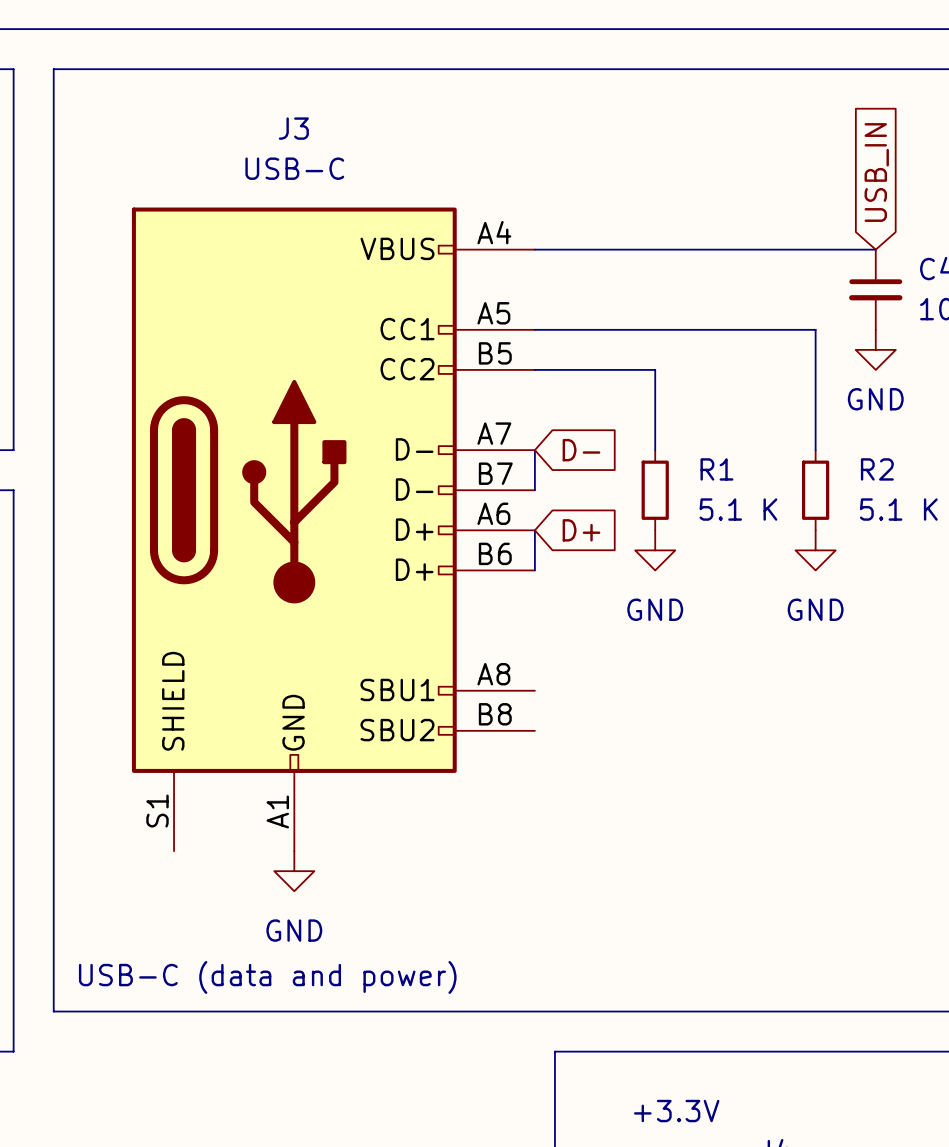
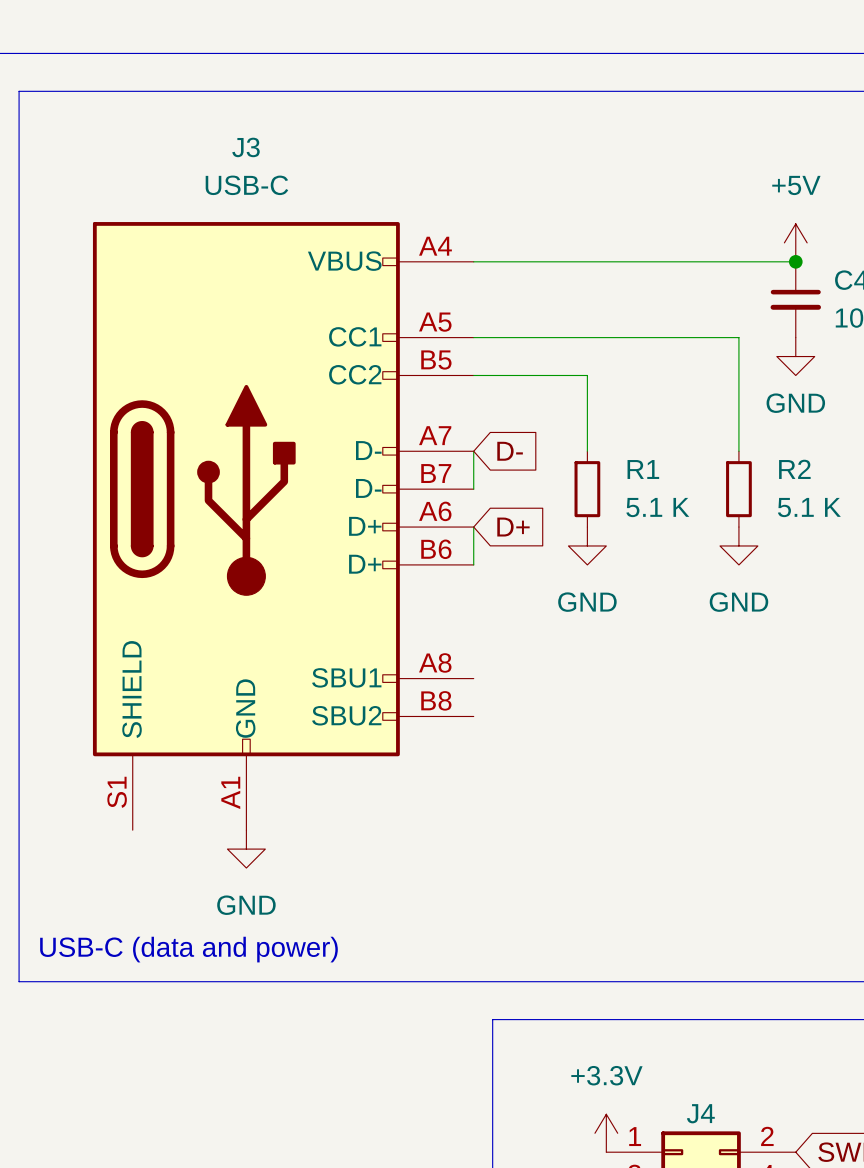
global label: USB_IN (876, 172) -> none
power symbol: none -> +5V (795, 242)
junction: none -> (795, 261)

